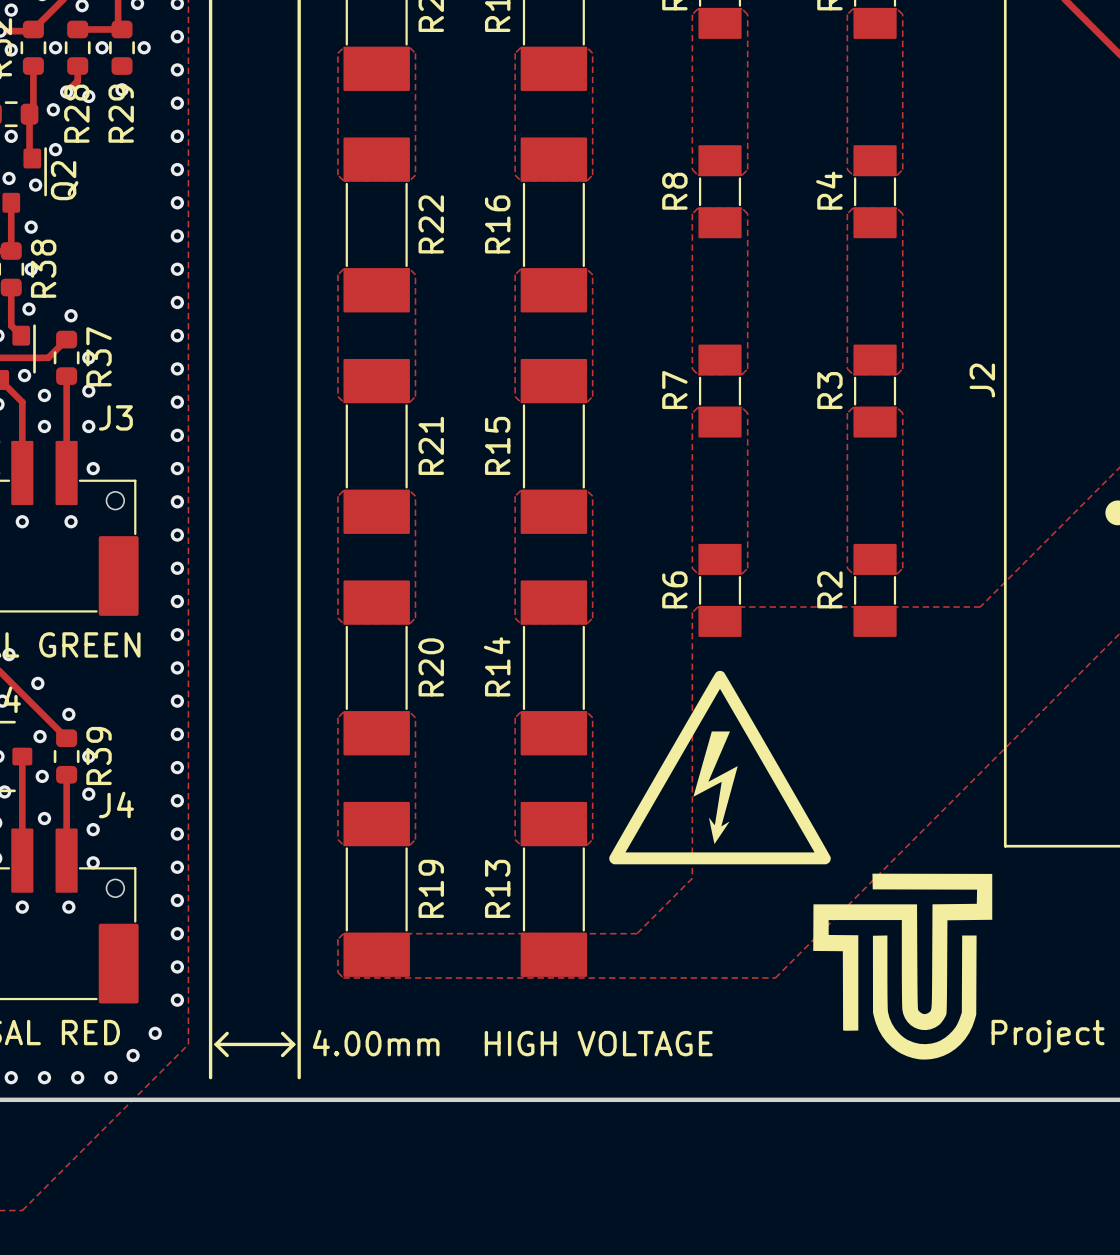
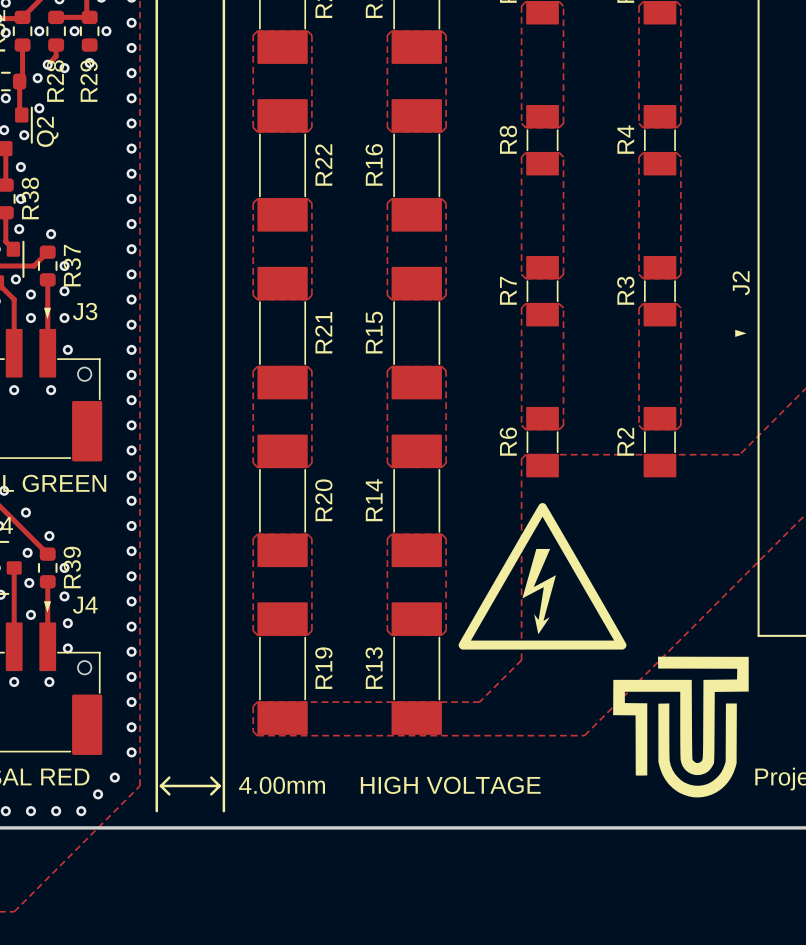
drawing: none -> [43, 307, 52, 320]
drawing: none -> [735, 329, 747, 337]
drawing: none -> [43, 601, 52, 613]

